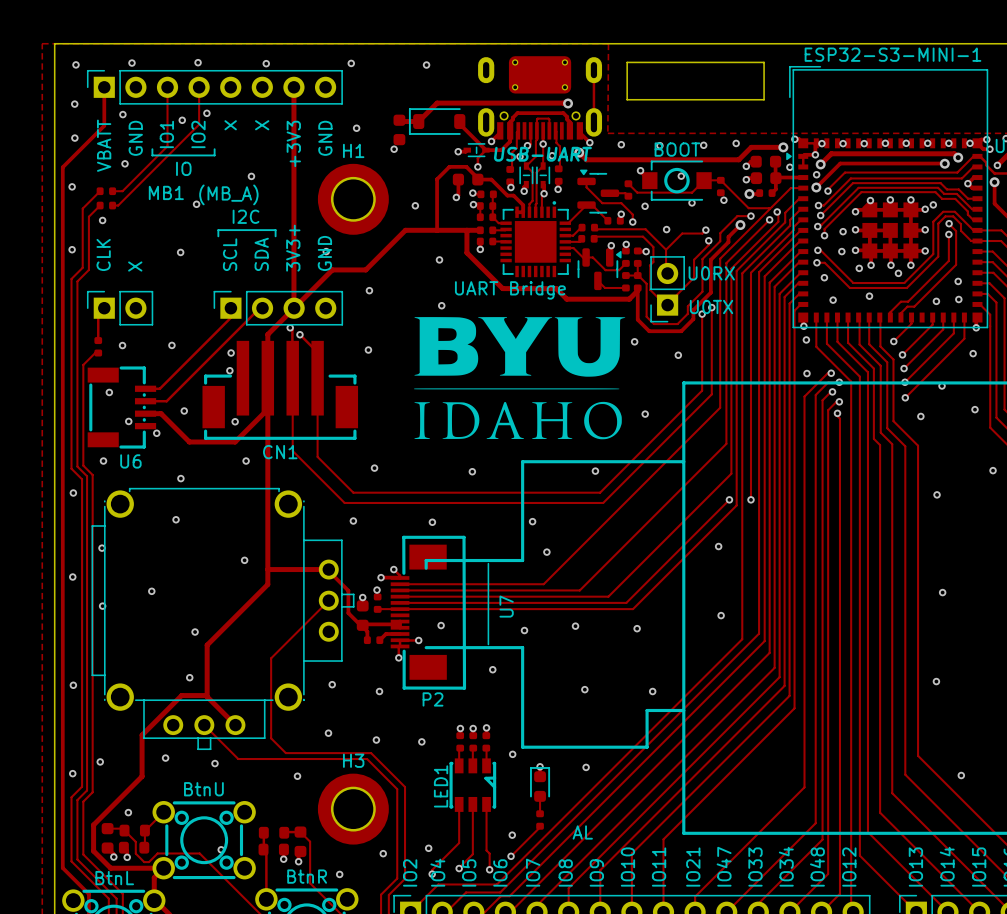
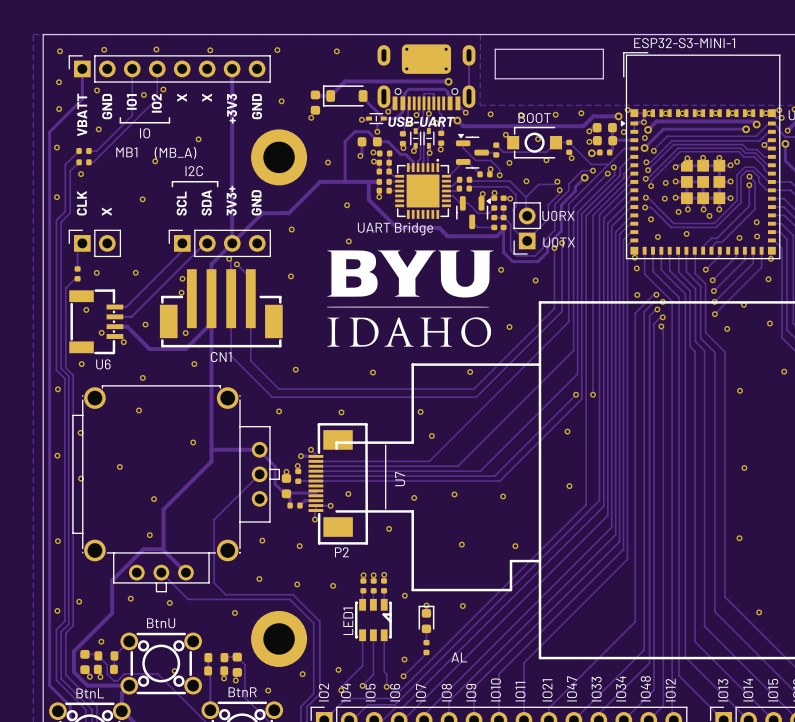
MB1 footprint: [151, 148, 277, 238] -> [119, 117, 219, 188]
H1 name: H1 (353, 150) -> none
H3 name: H3 (353, 760) -> none

